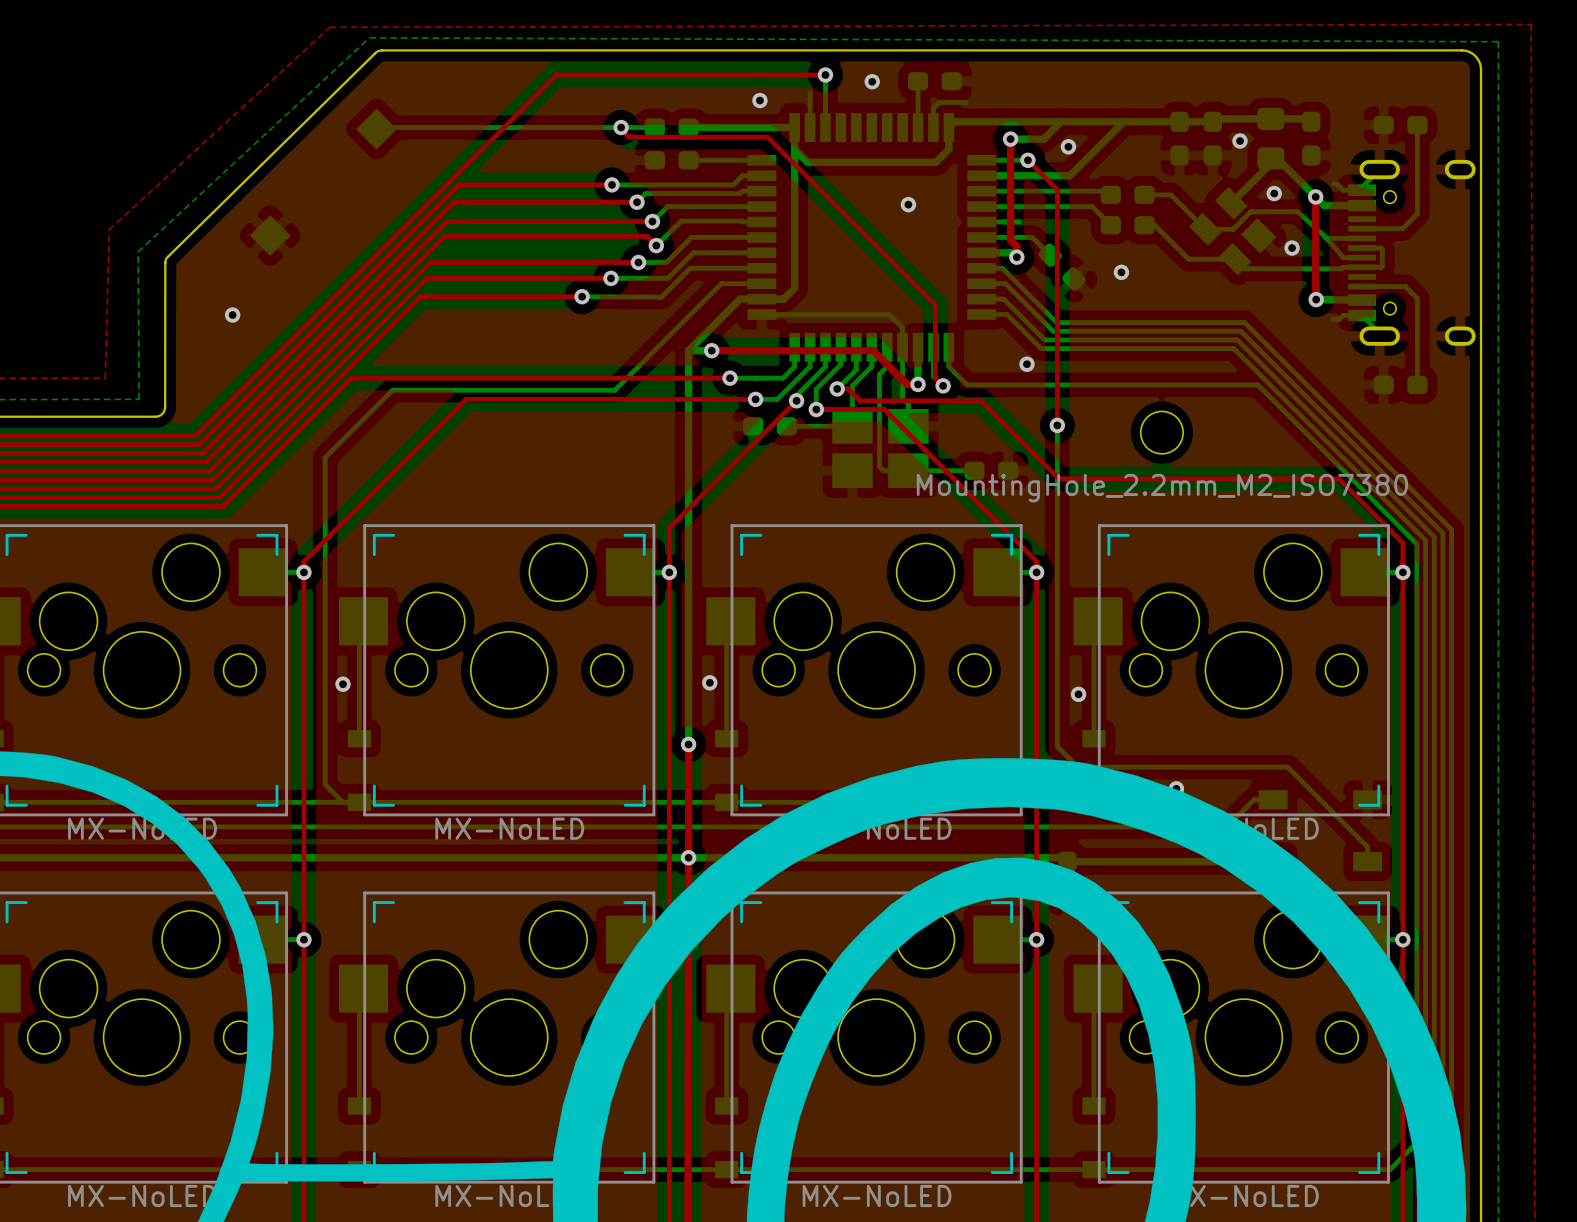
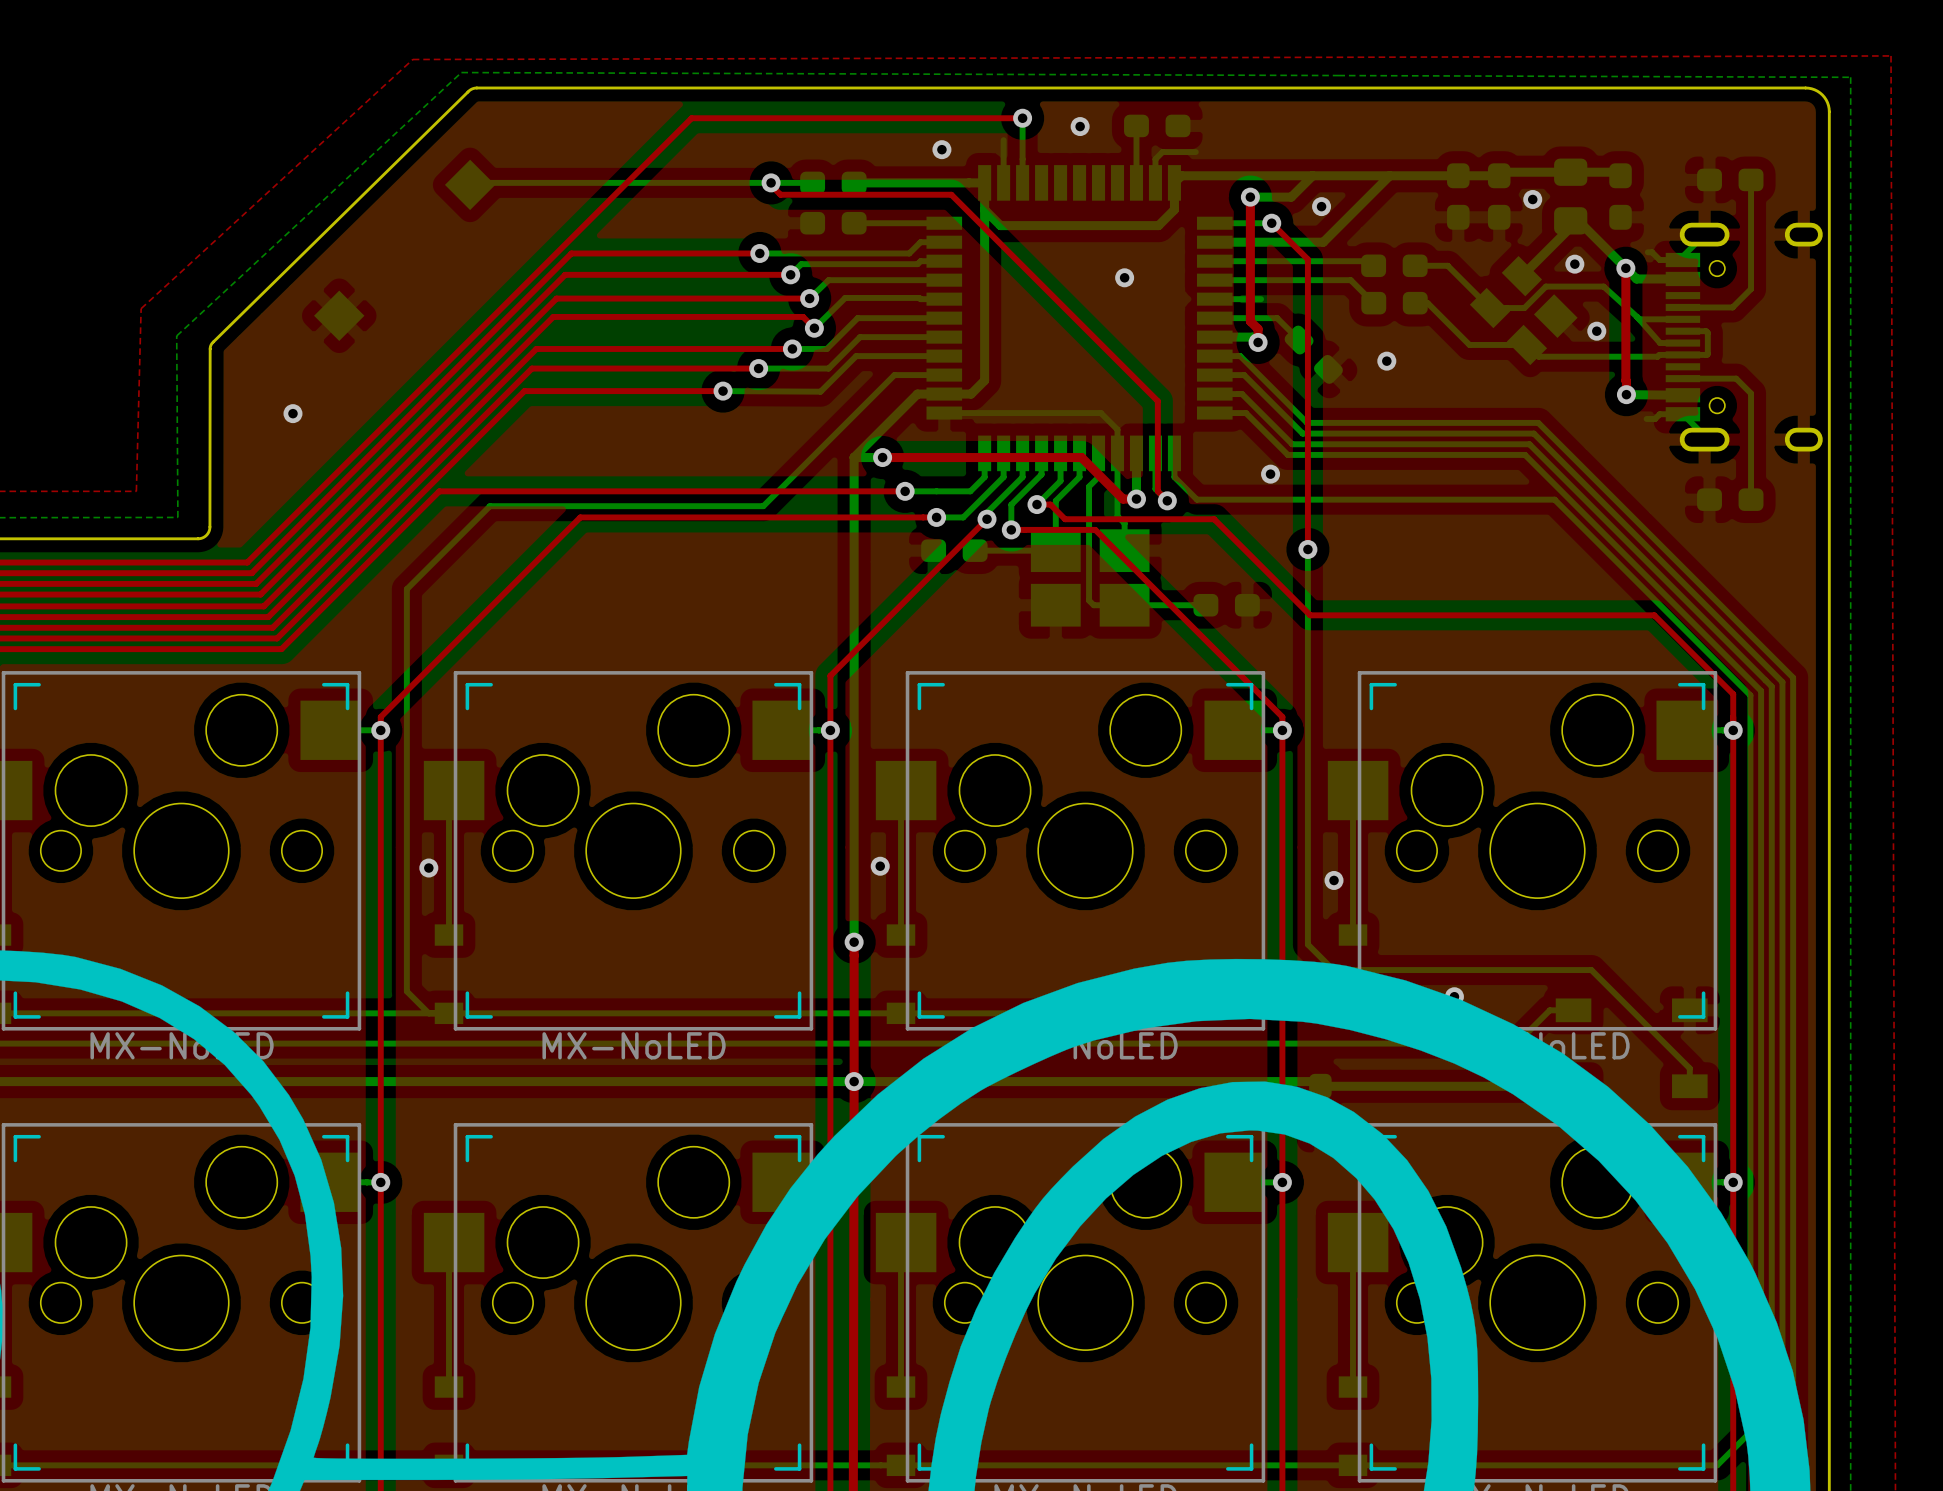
part: MountingHole_2.2mm_M2_ISO7380 (1161, 432) -> none

